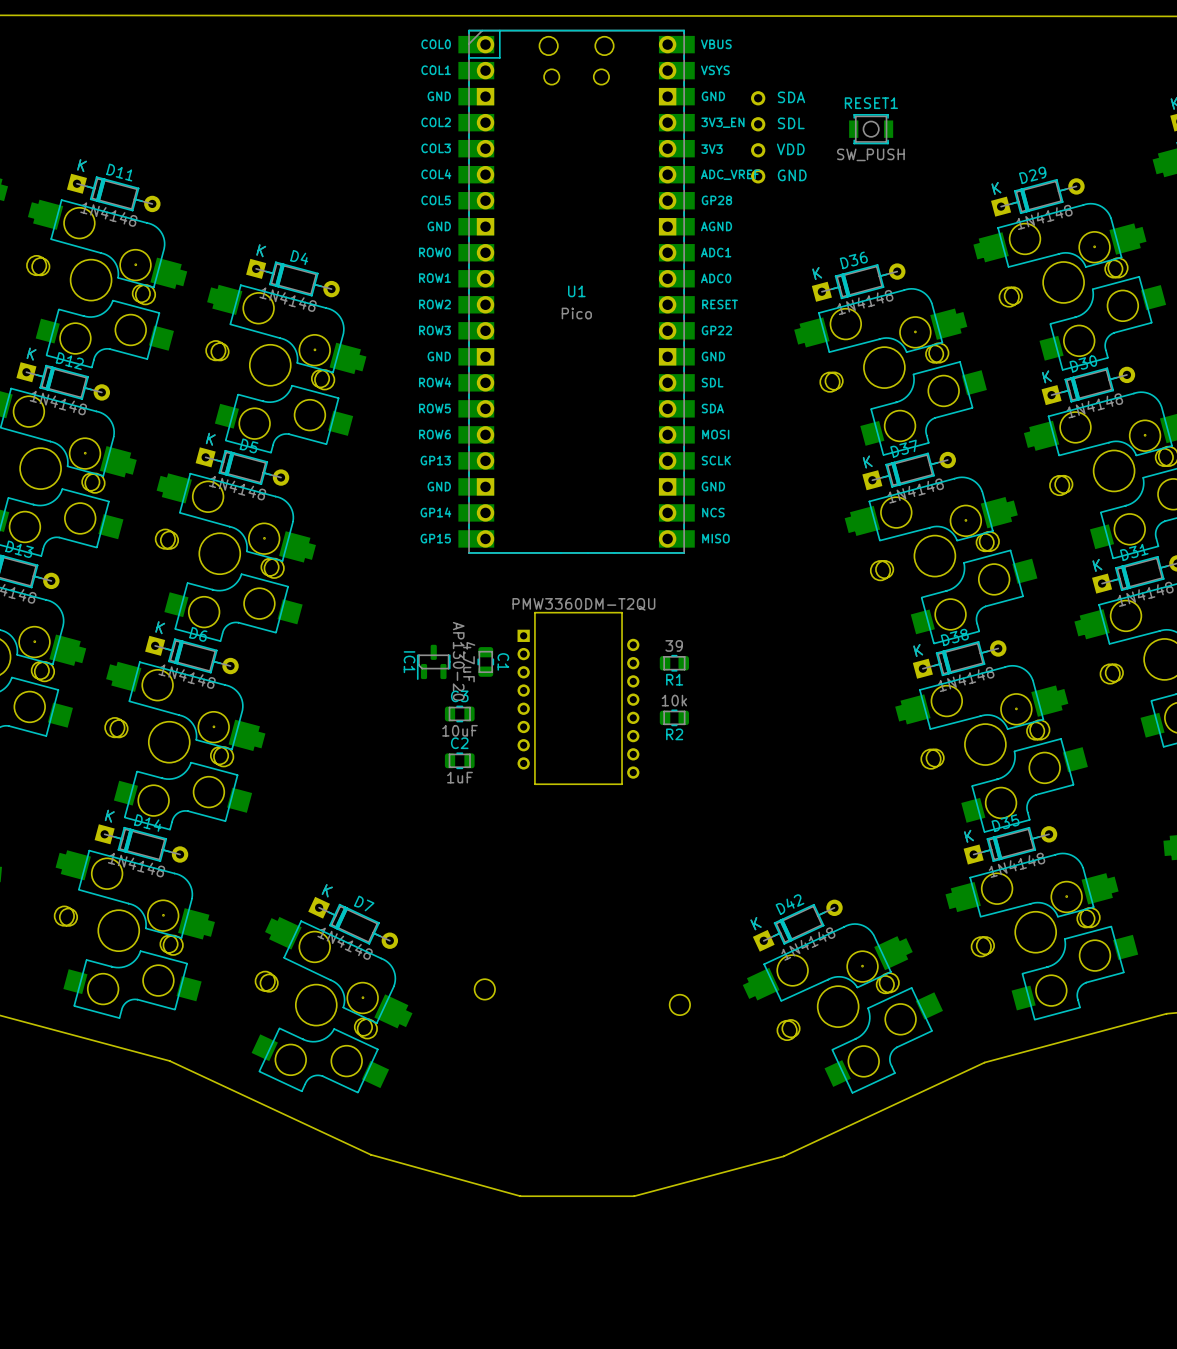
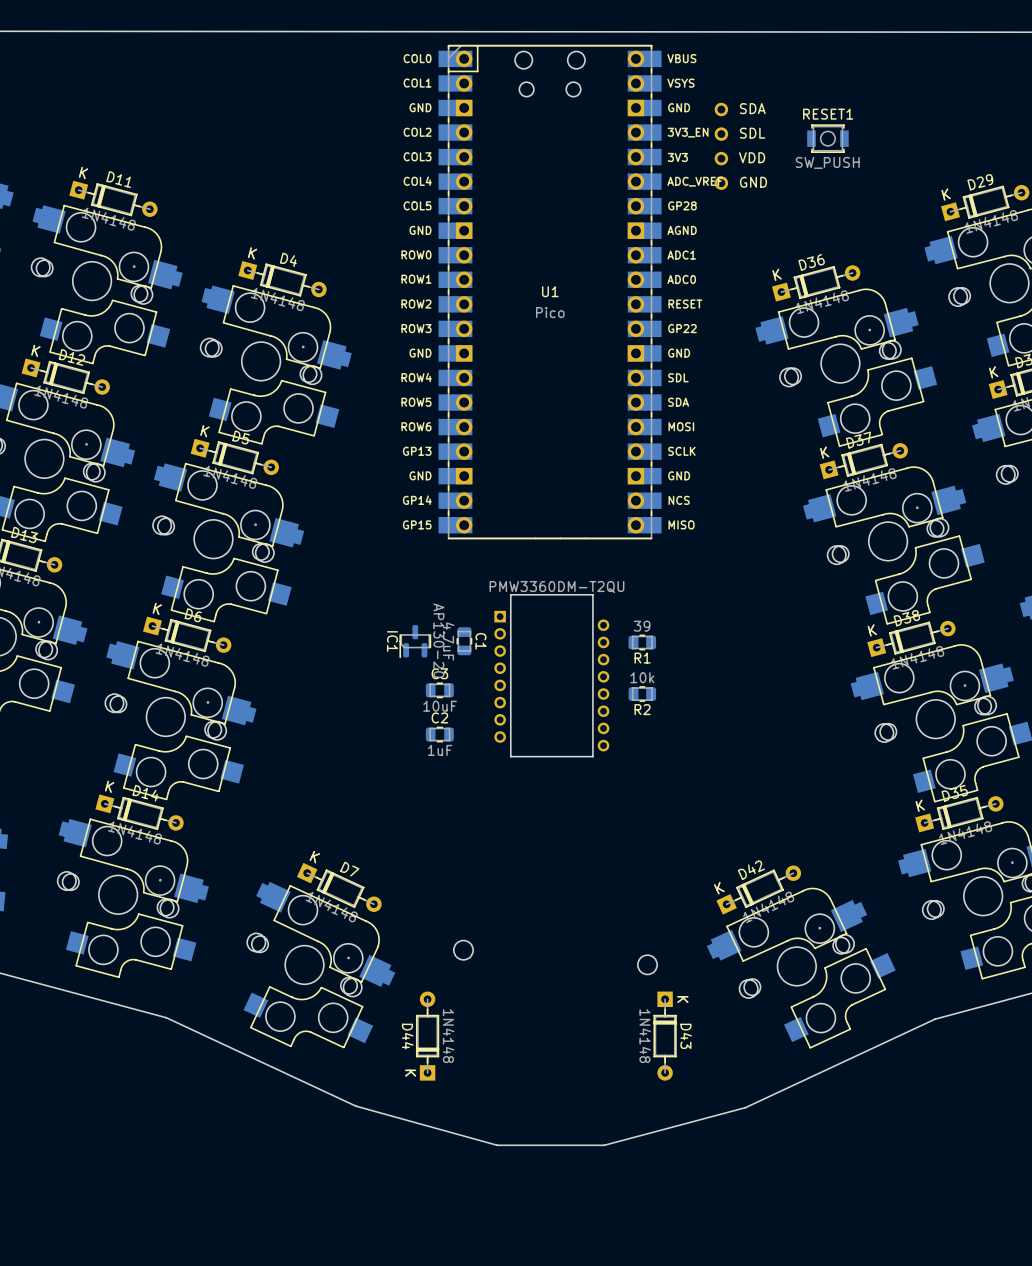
D44: none -> 1N4148 (427, 1036)
D43: none -> 1N4148 (665, 1036)

